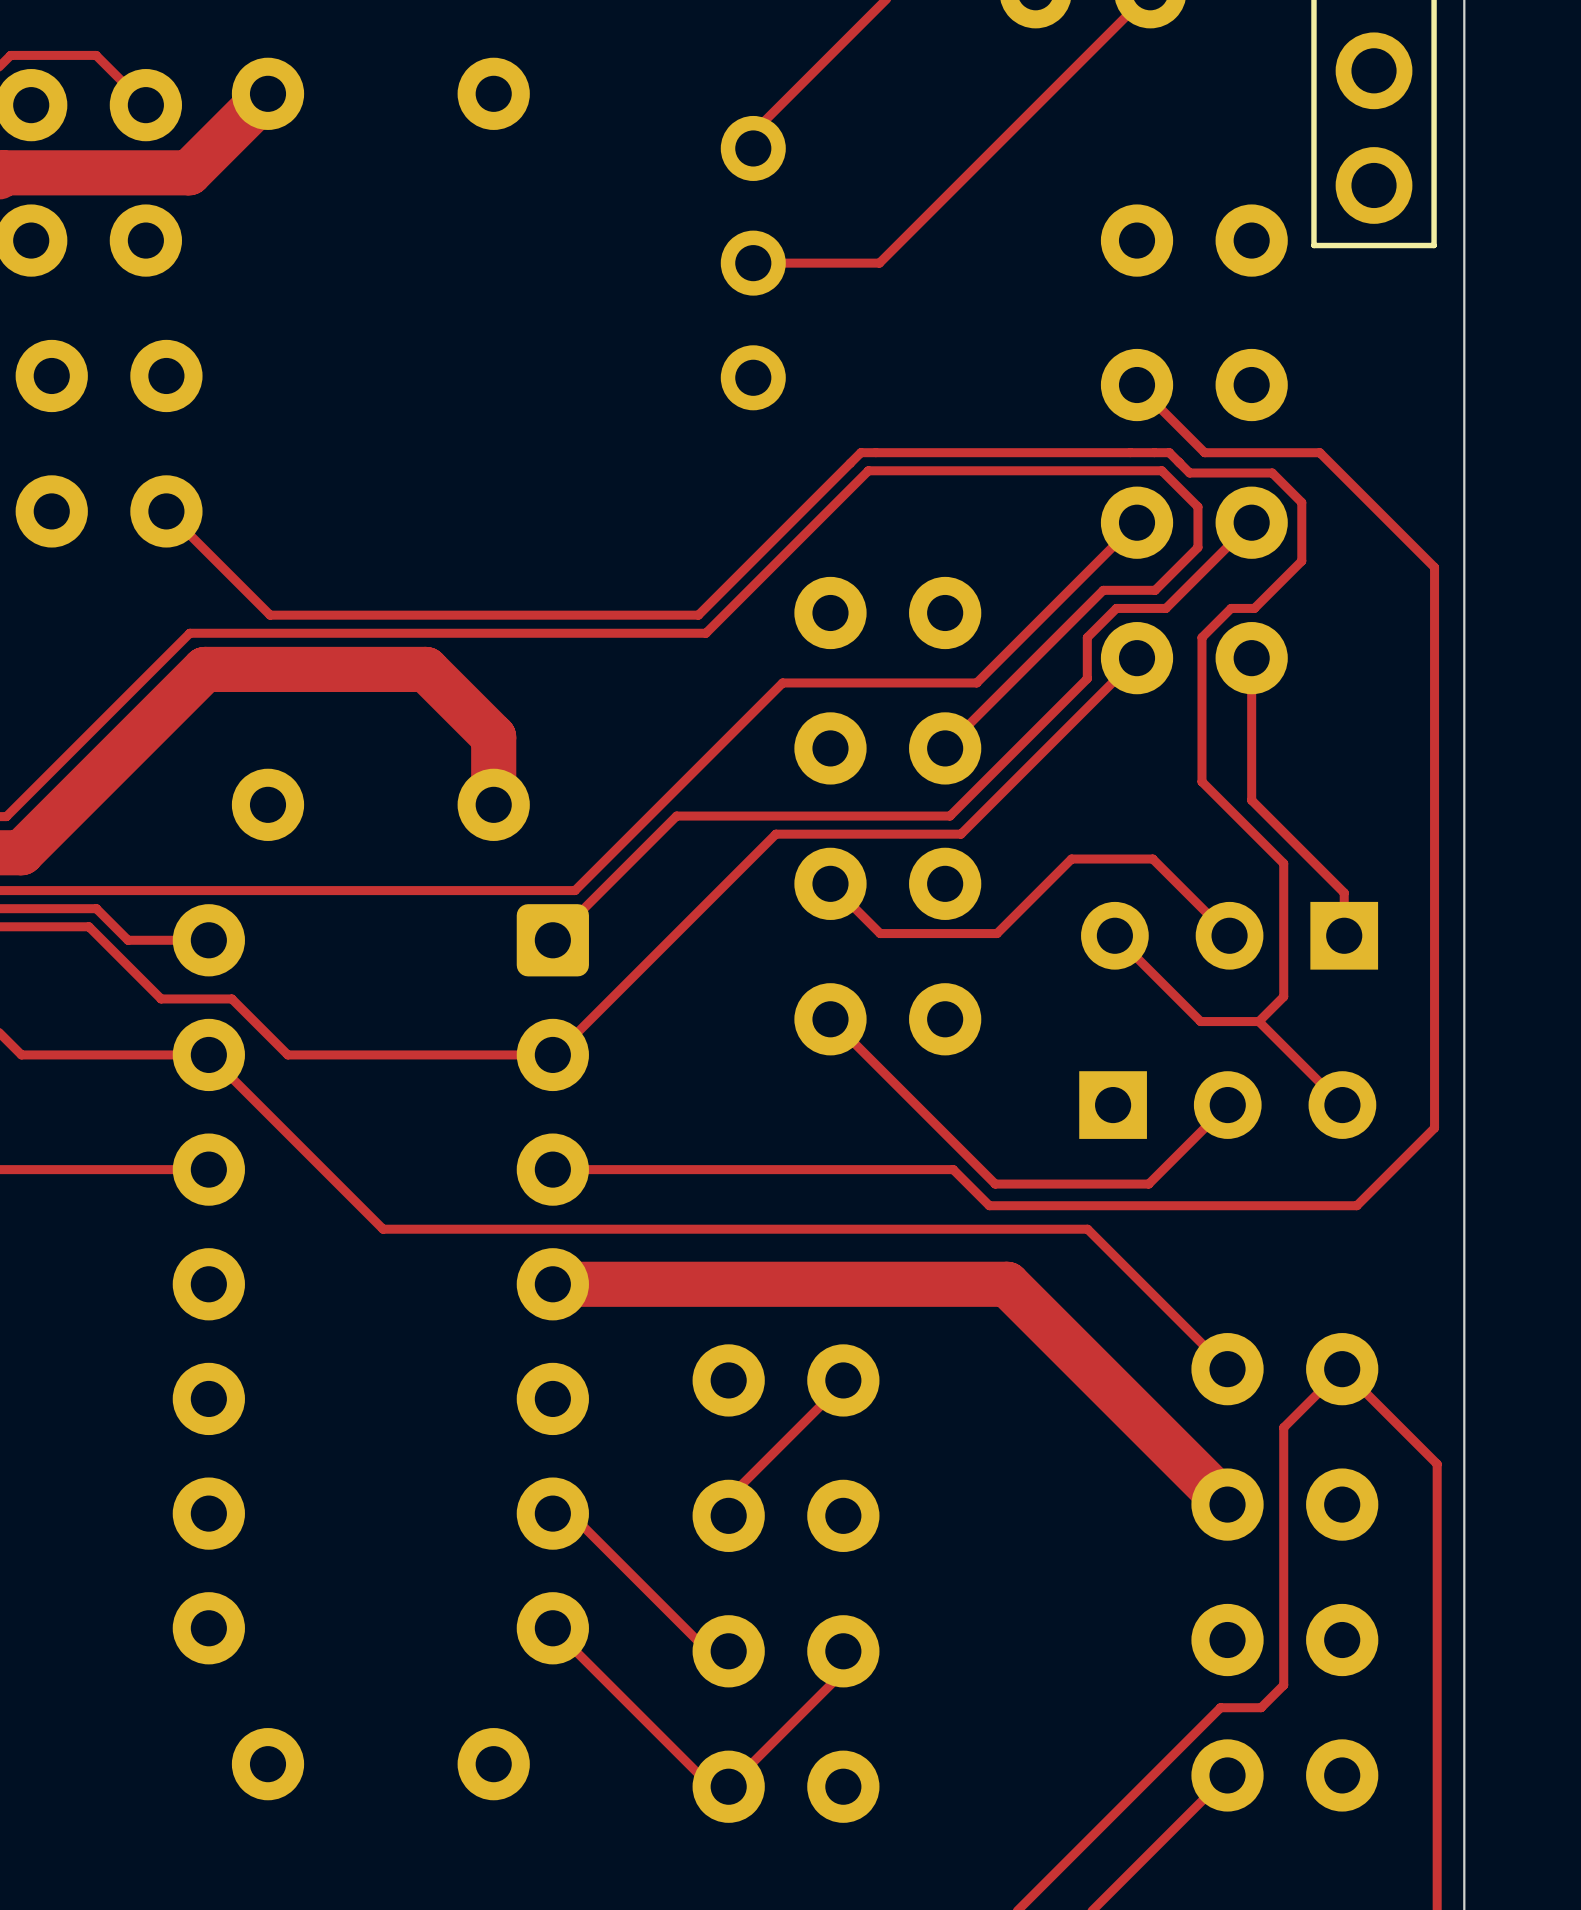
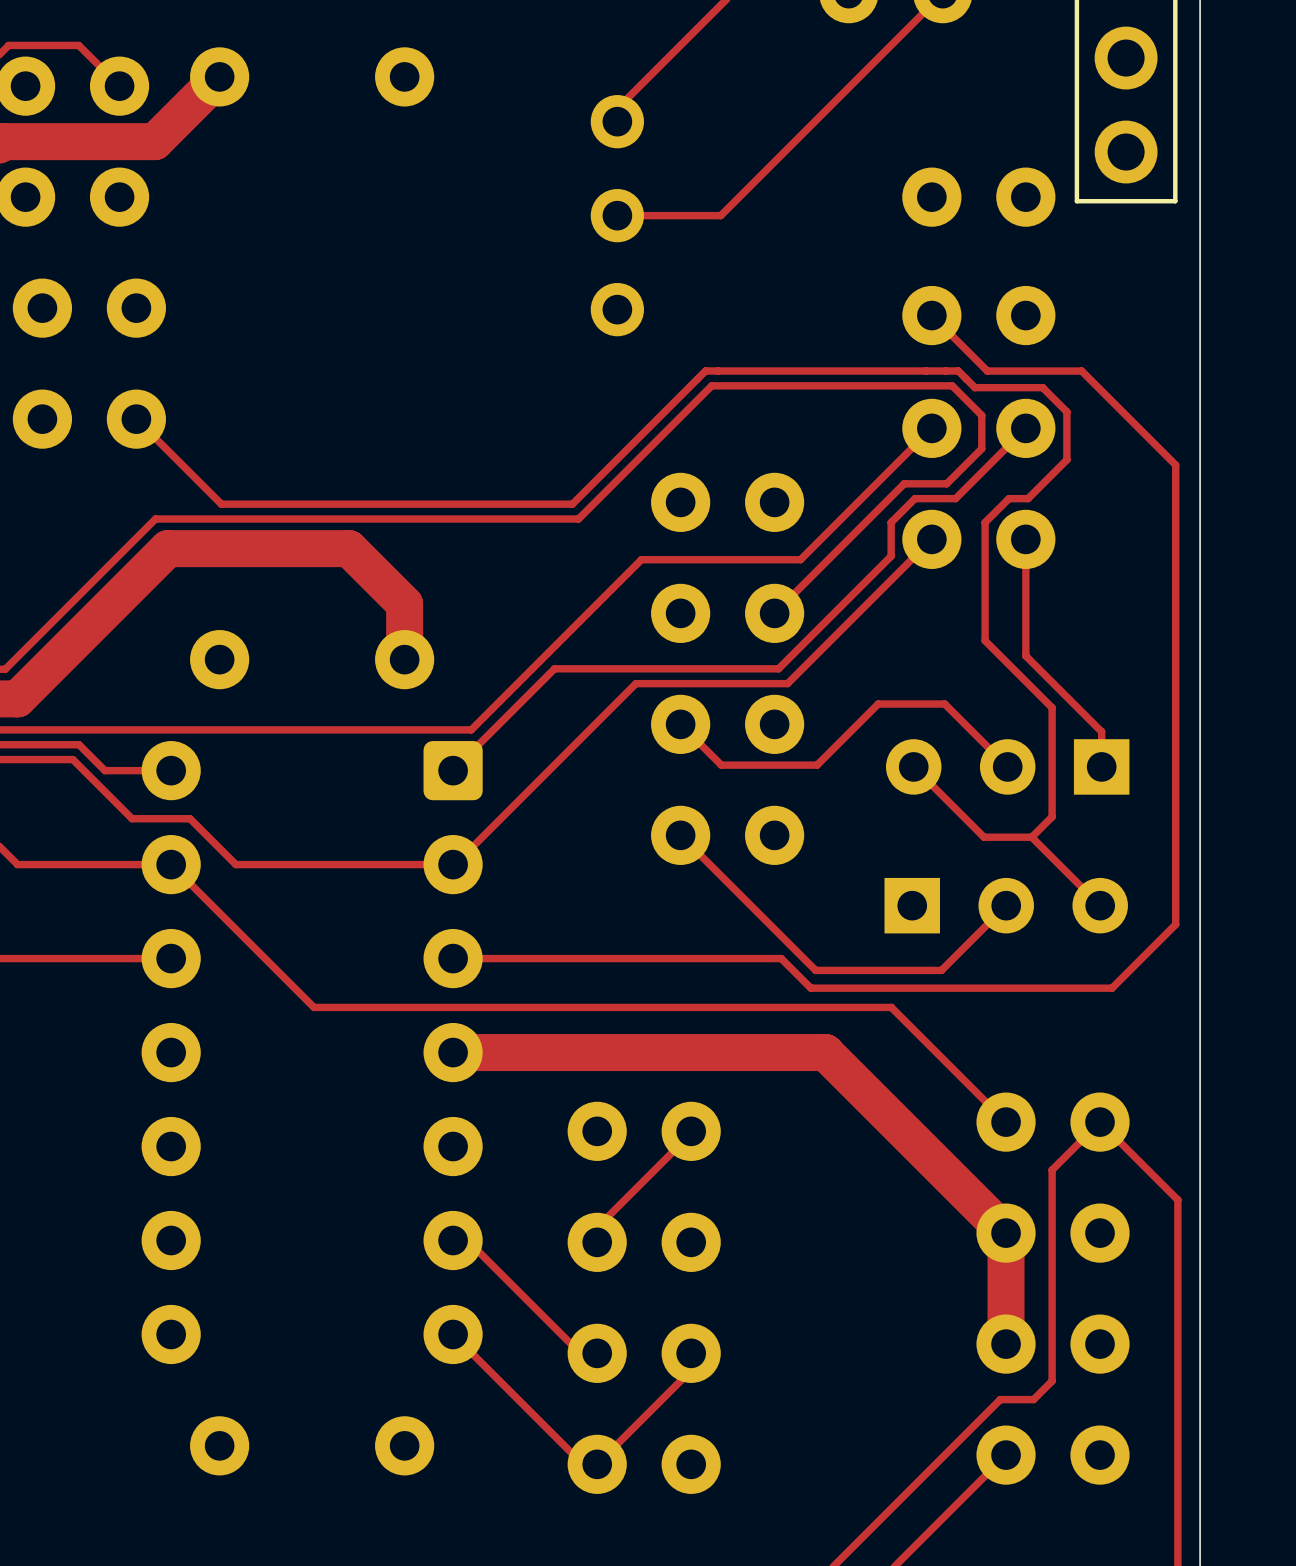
track: none -> (1006, 1233) (1006, 1344)

